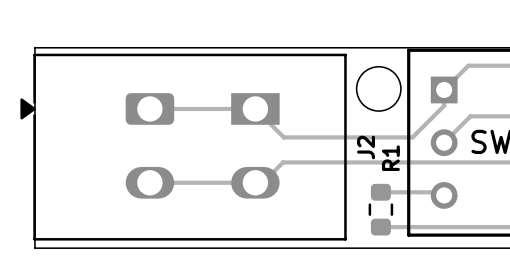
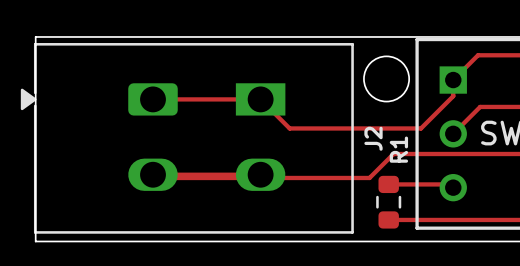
track: (385, 162) (283, 162) (262, 182) -> (393, 154) (369, 177) (153, 177)

